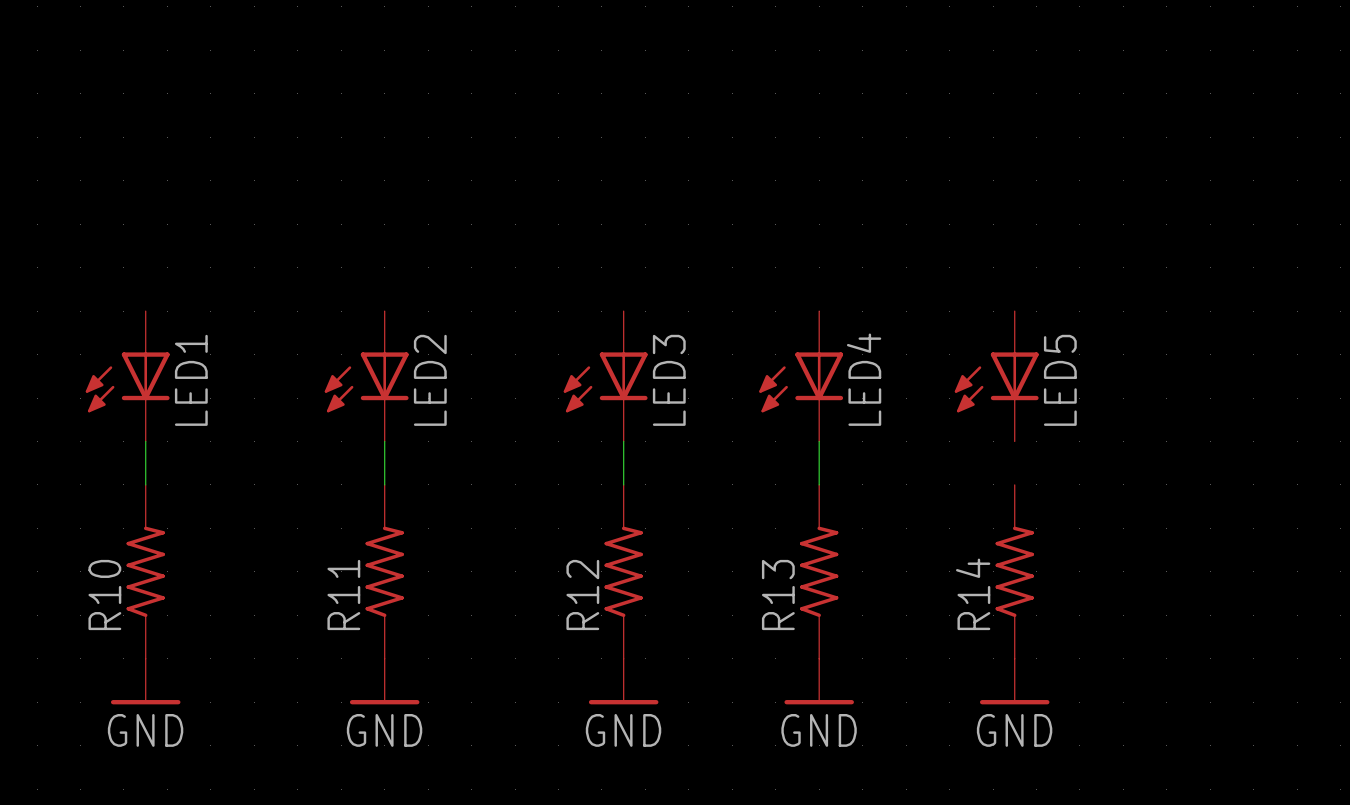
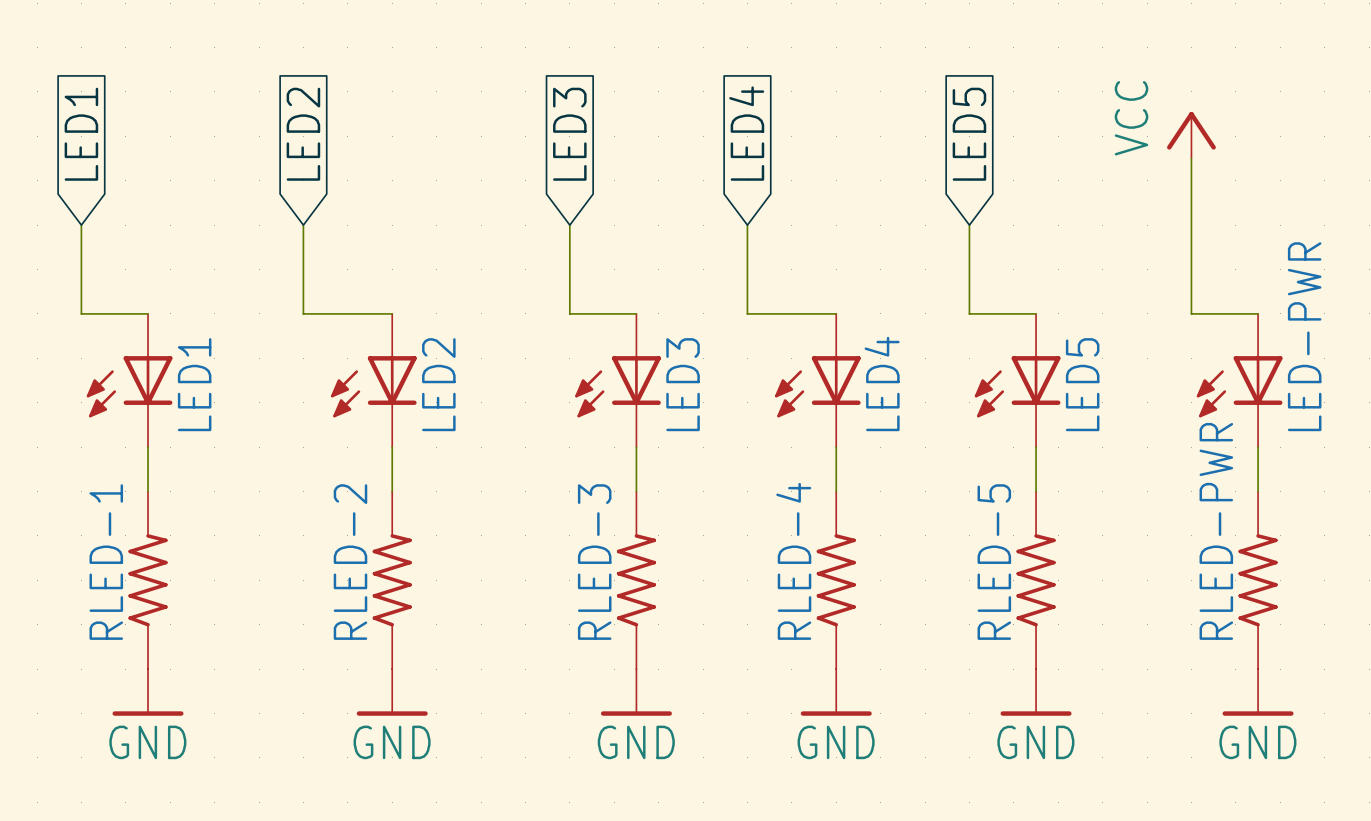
global label: none -> LED4 (746, 133)
global label: none -> LED1 (81, 134)
global label: none -> LED2 (303, 134)
global label: none -> LED3 (569, 134)
global label: none -> LED5 (969, 134)
power symbol: none -> VCC (1191, 135)
wire: none -> (1191, 158) (1191, 313) (1258, 313)
wire: none -> (81, 225) (81, 313) (148, 313)
wire: none -> (303, 225) (303, 313) (392, 313)
wire: none -> (569, 225) (569, 313) (636, 313)
wire: none -> (747, 225) (747, 313) (836, 313)
wire: none -> (969, 225) (969, 313) (1036, 313)
LED-PWR: none -> (1239, 380)
wire: none -> (1036, 447) (1036, 491)
wire: none -> (1258, 447) (1258, 491)
RLED-PWR: none -> (1258, 580)
R10 name: R10 (104, 594) -> RLED-1 (106, 562)
R11 name: R11 (343, 594) -> RLED-2 (350, 562)
R12 name: R12 (582, 594) -> RLED-3 (594, 562)
R13 name: R13 (778, 594) -> RLED-4 (793, 561)
R14 name: R14 (973, 594) -> RLED-5 (994, 562)
power symbol: none -> GND (1258, 692)

